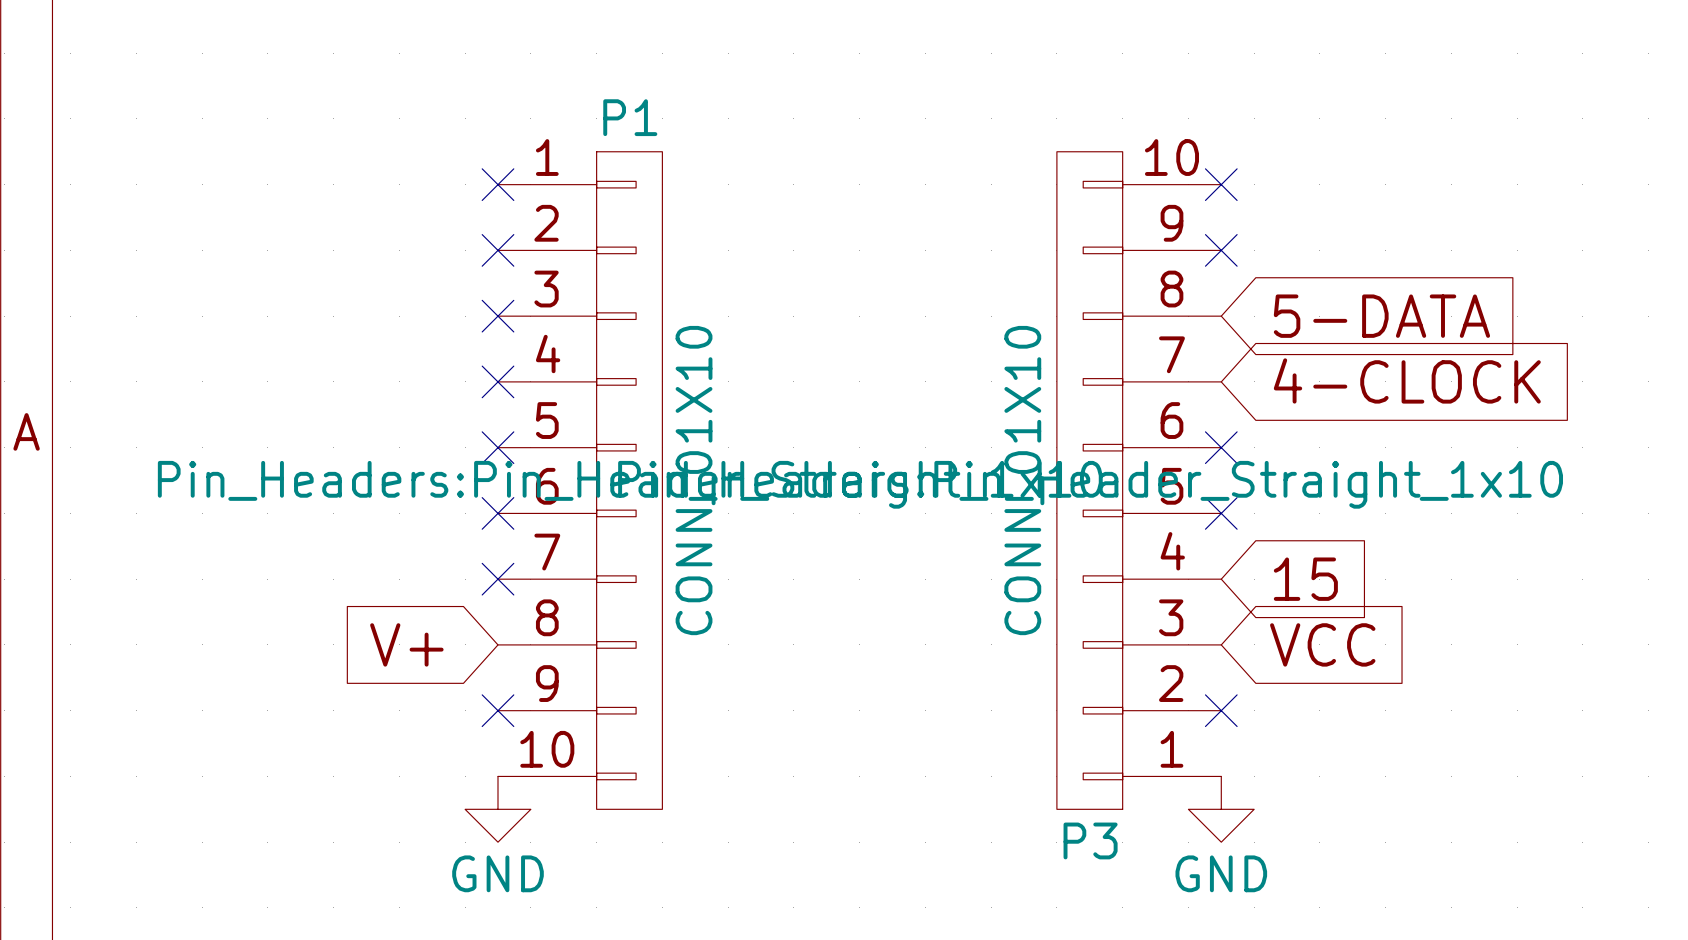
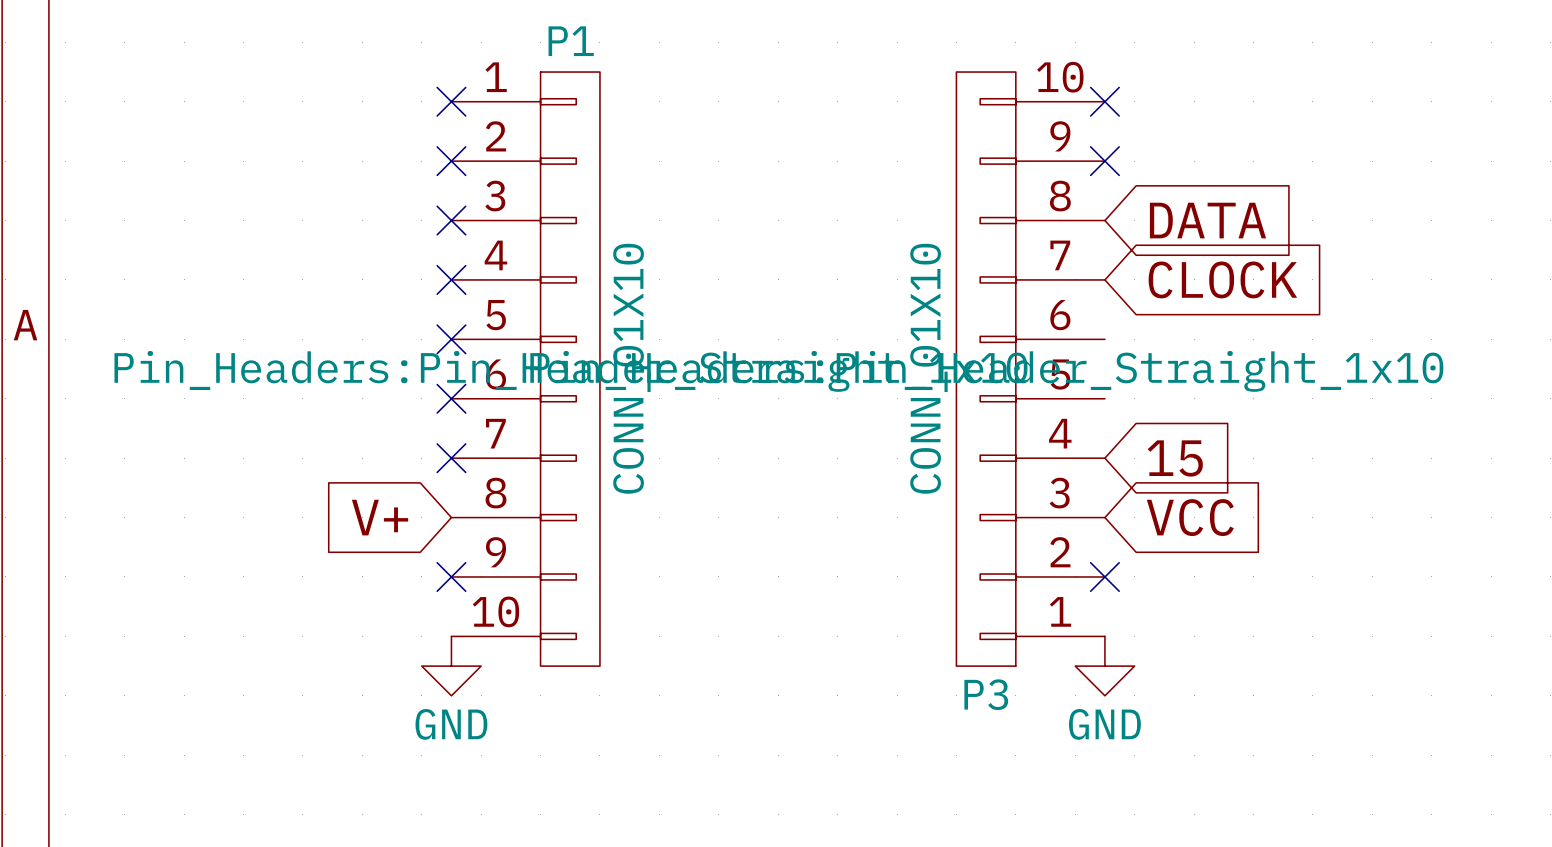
global label: 5-DATA (1381, 316) -> DATA (1207, 220)
global label: 4-CLOCK (1407, 380) -> CLOCK (1222, 279)
no-connect mark: (1221, 447) -> none
no-connect mark: (1221, 513) -> none

